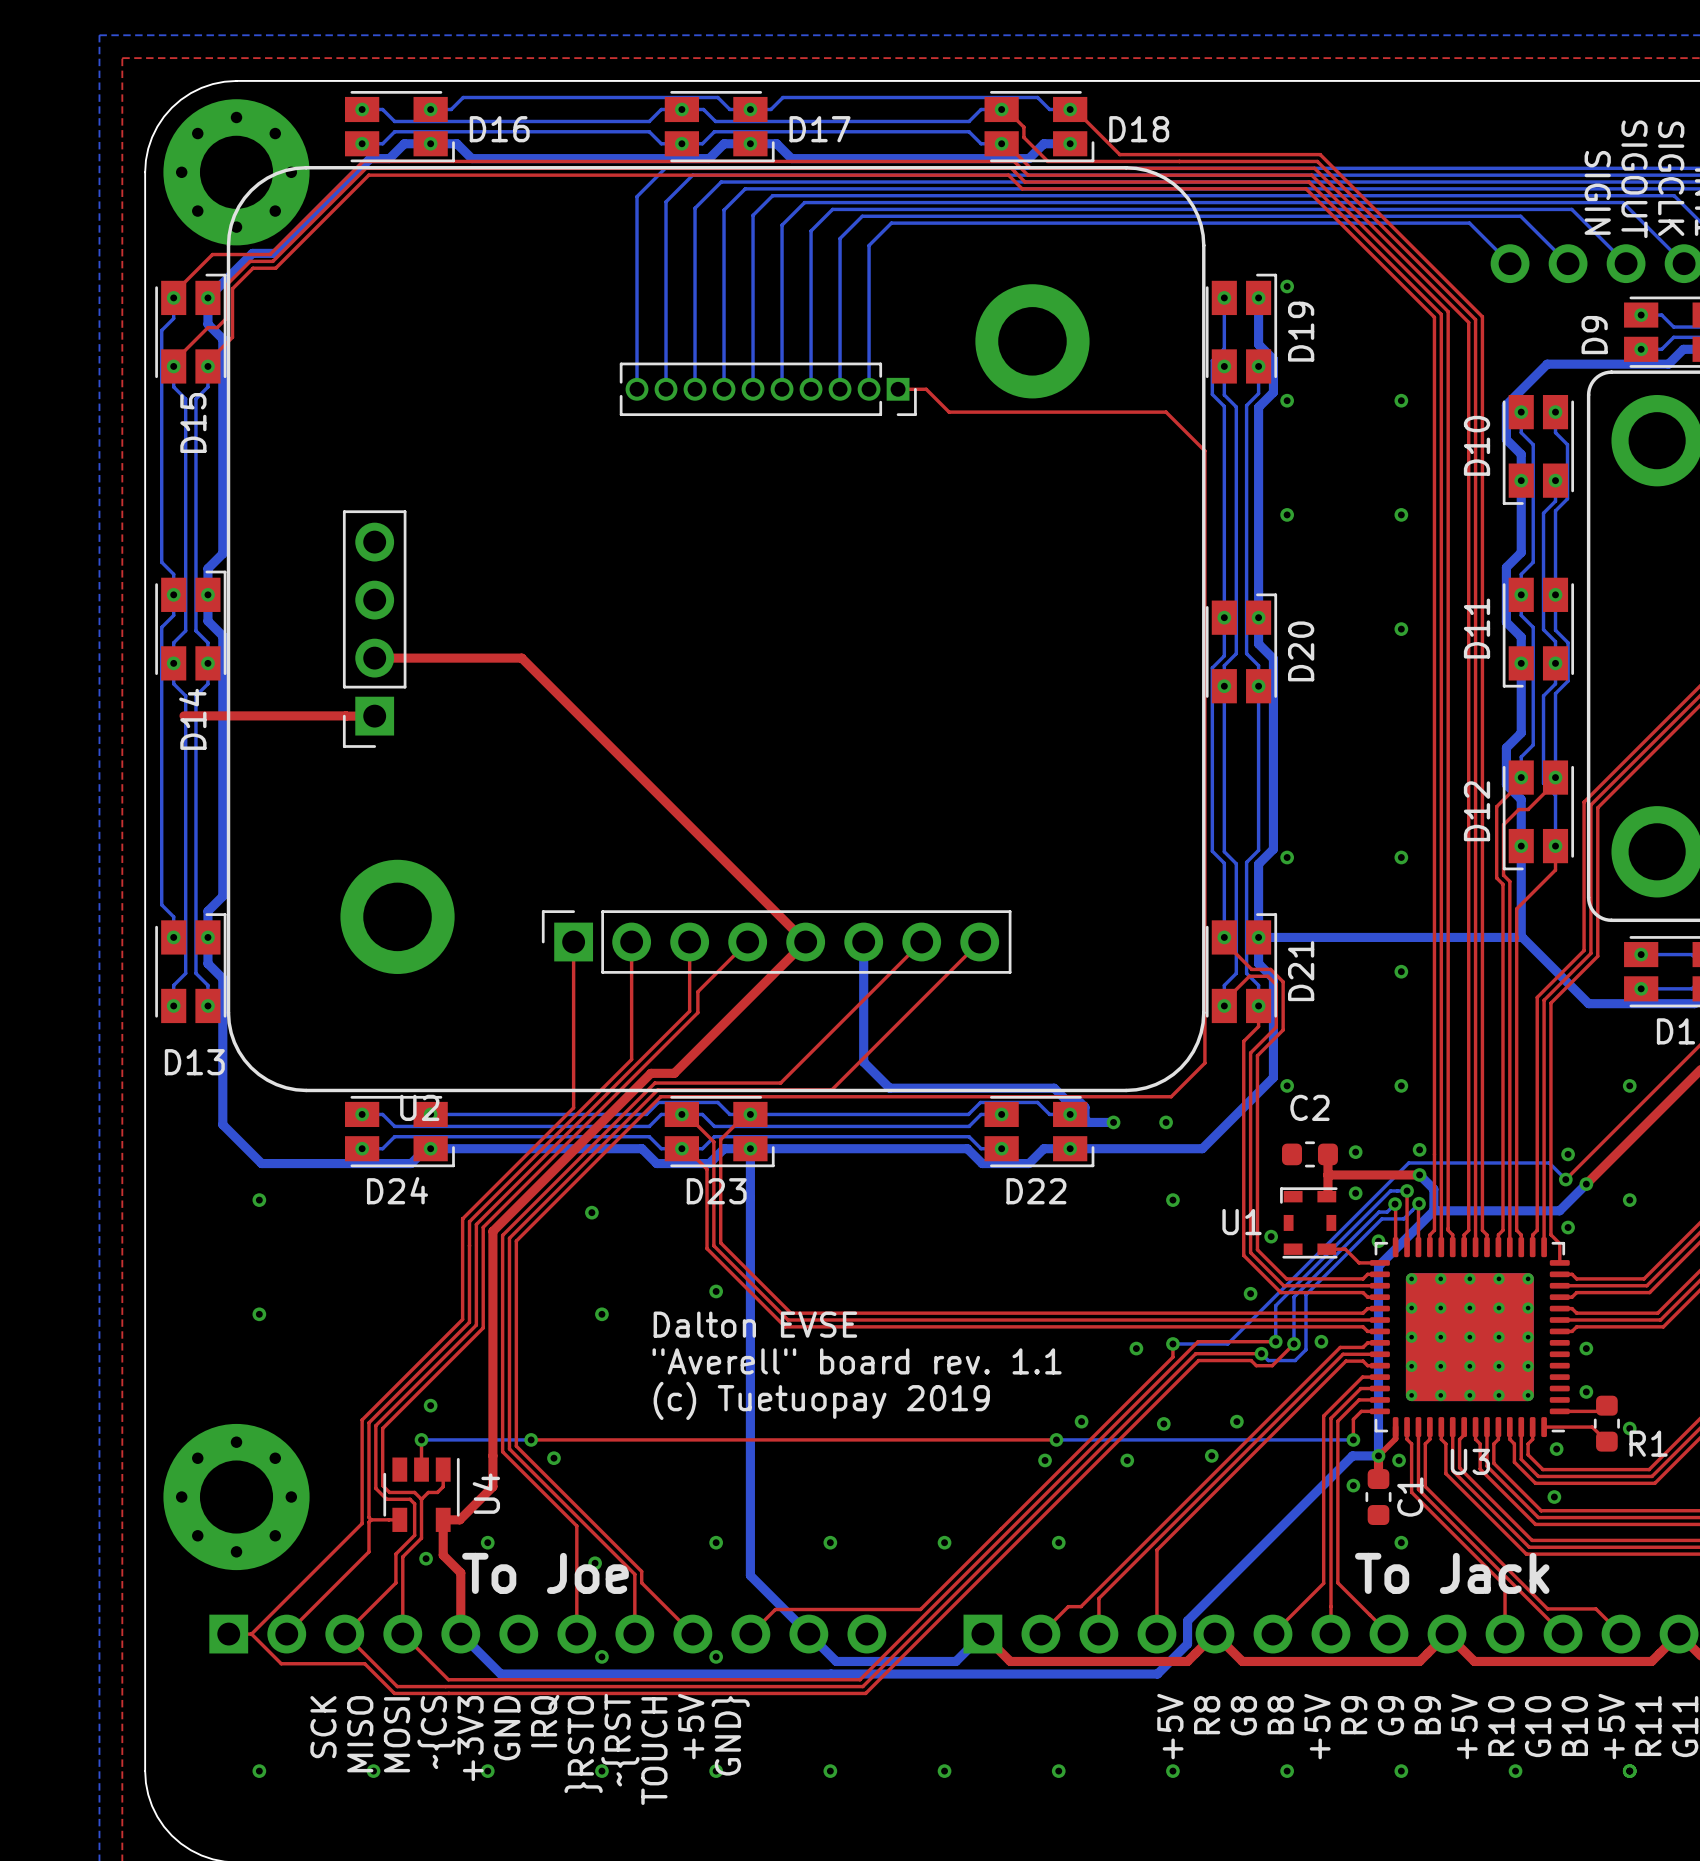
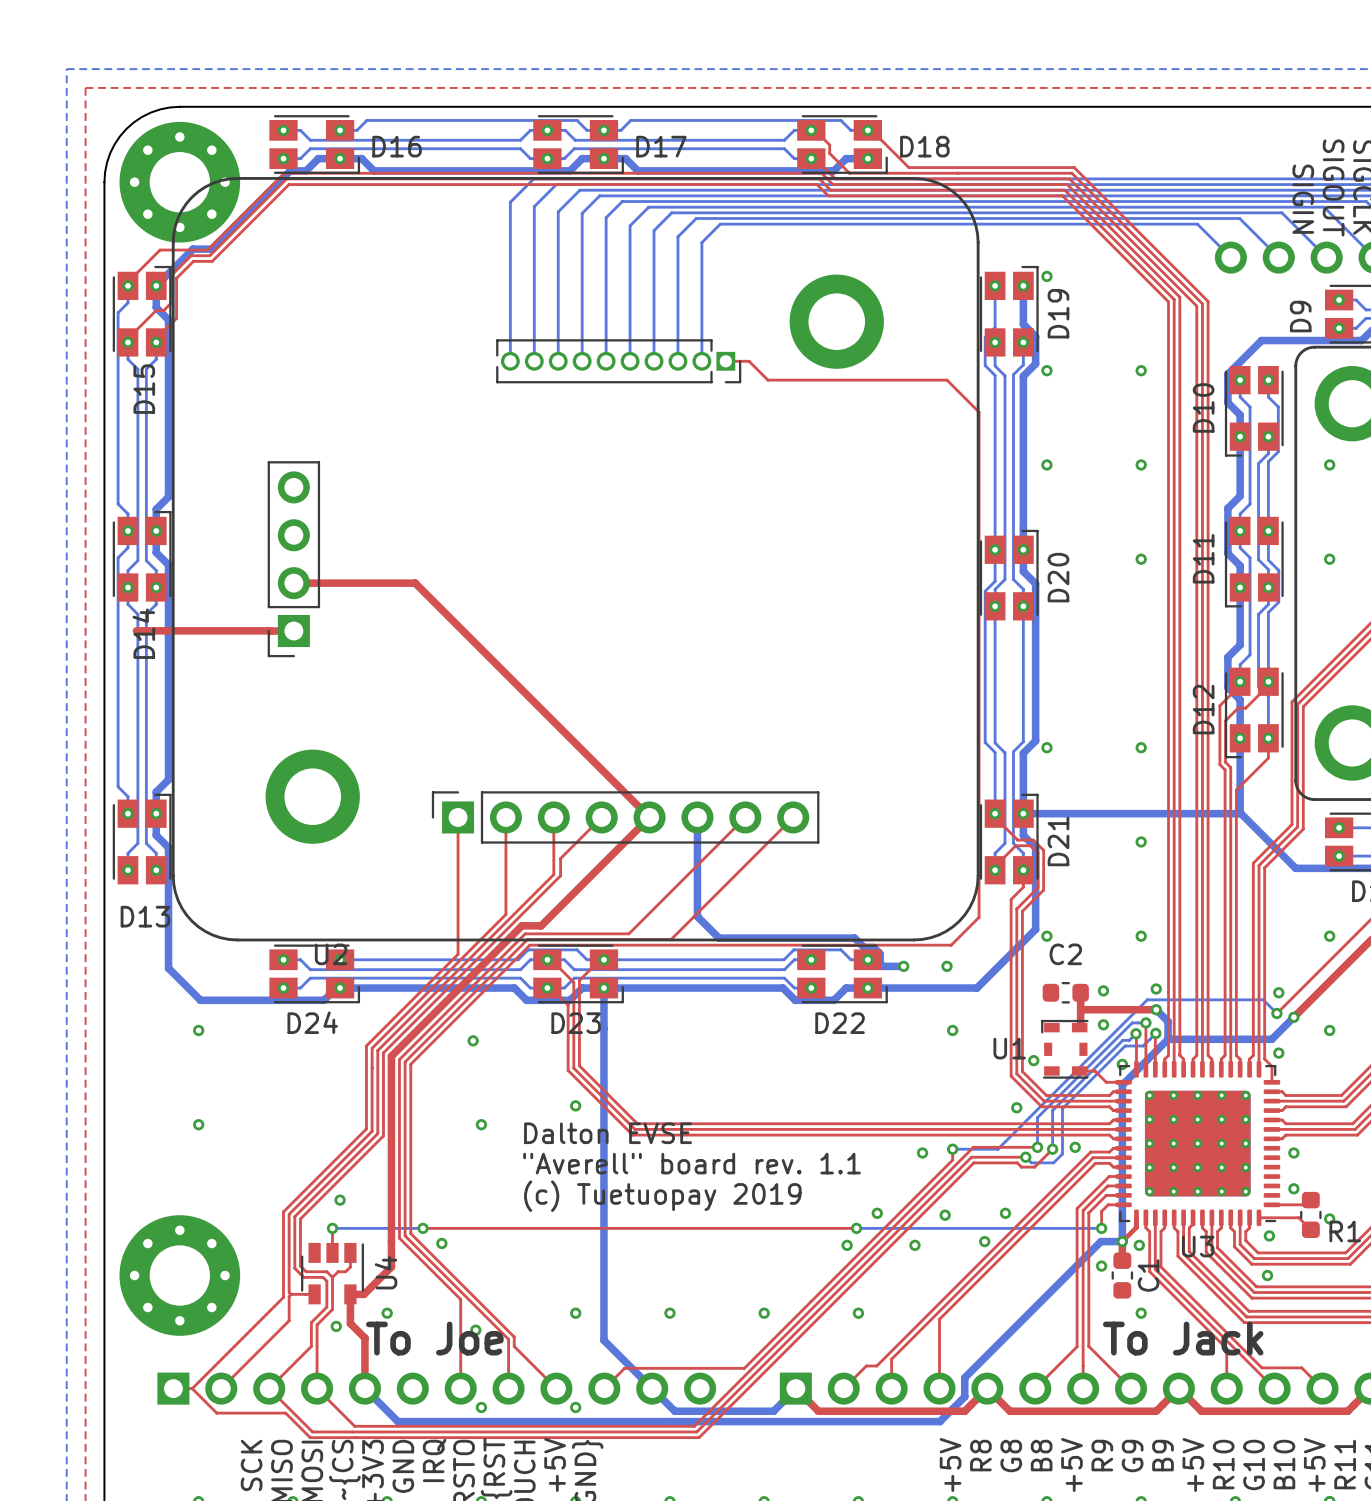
via: none -> (1329, 464)
via: none -> (1329, 559)

